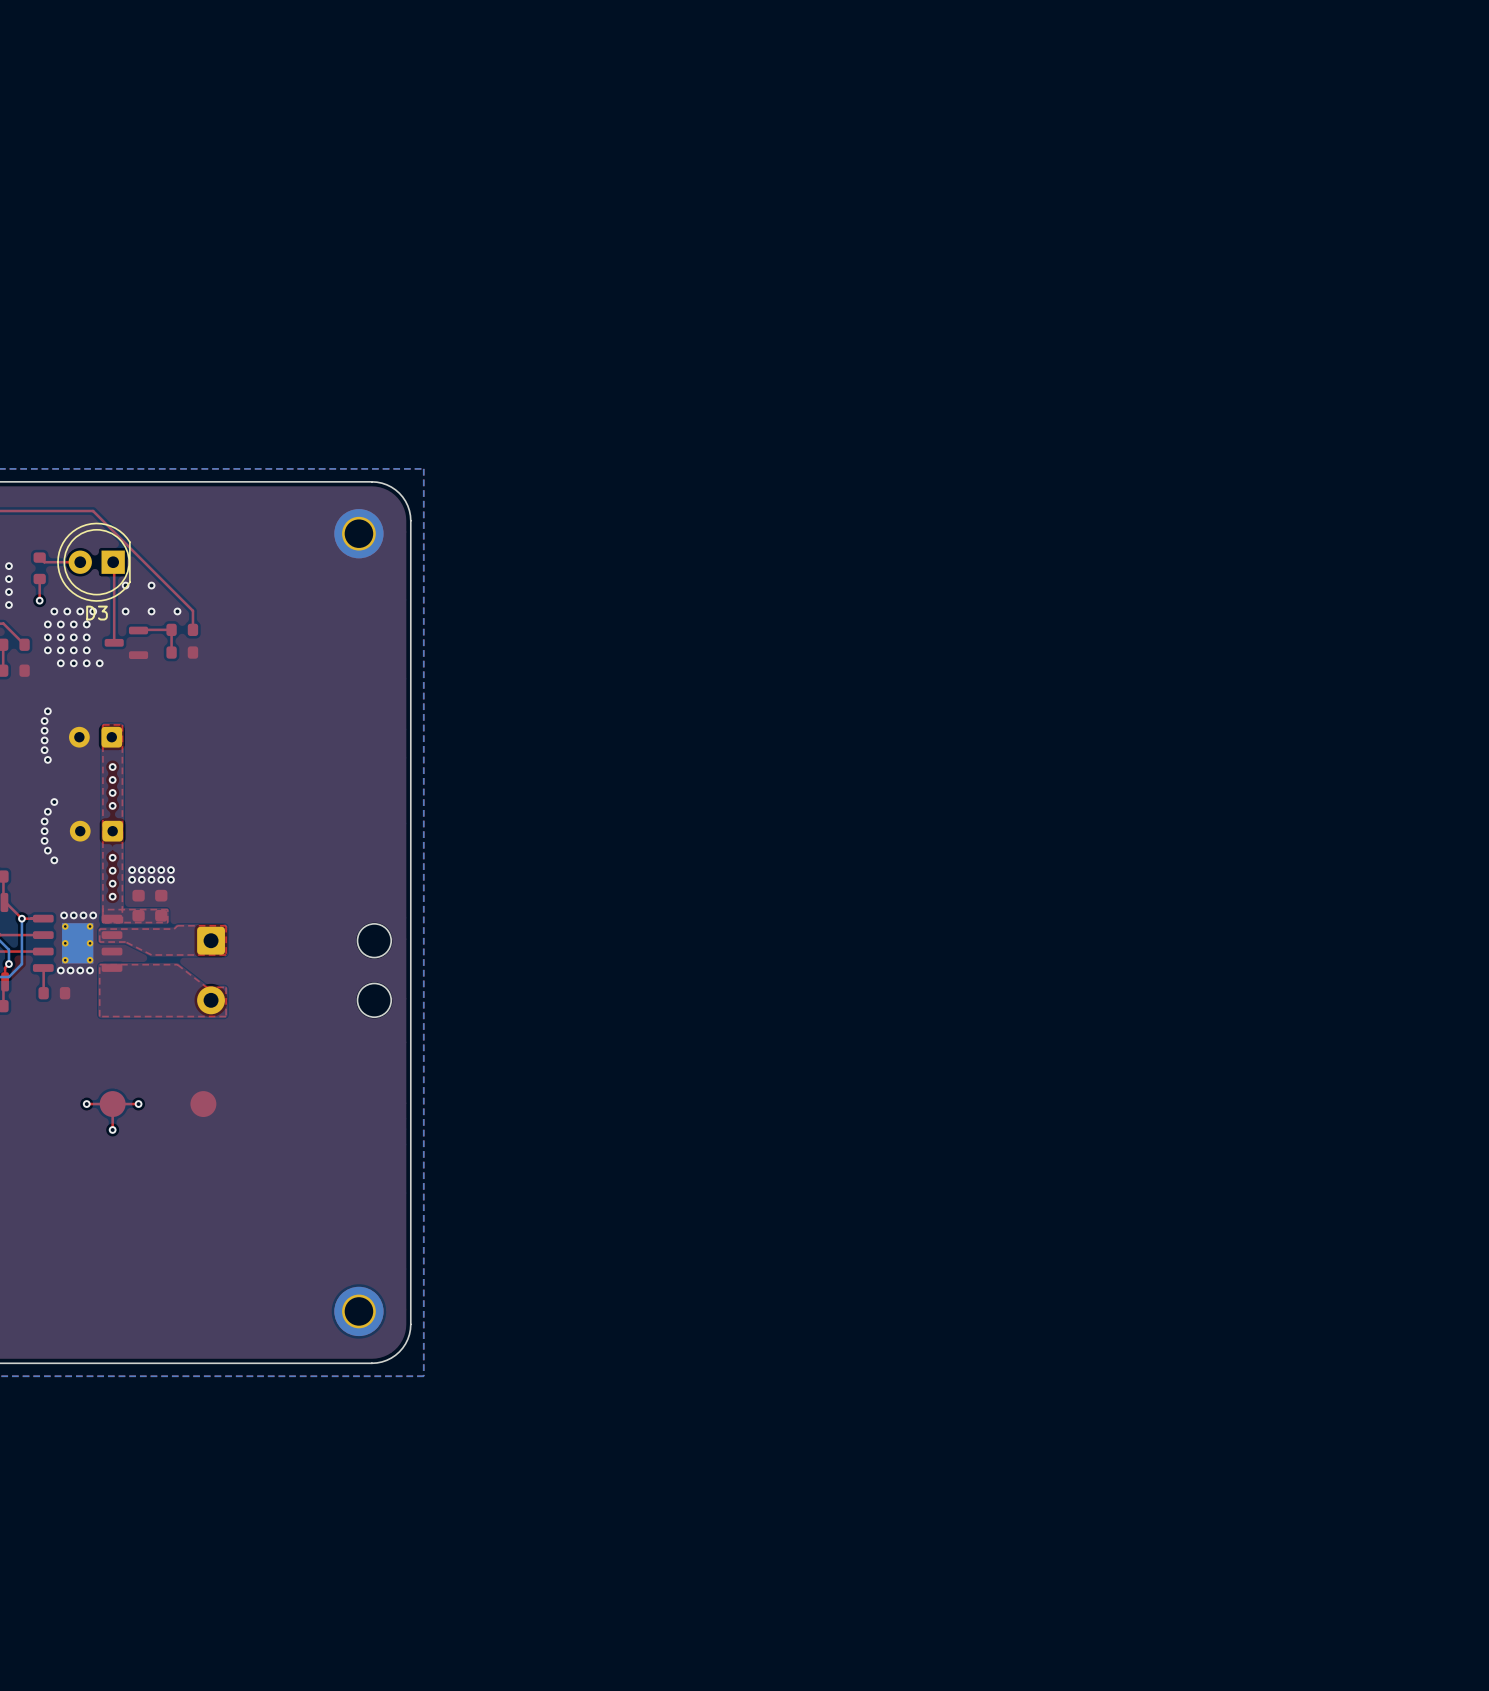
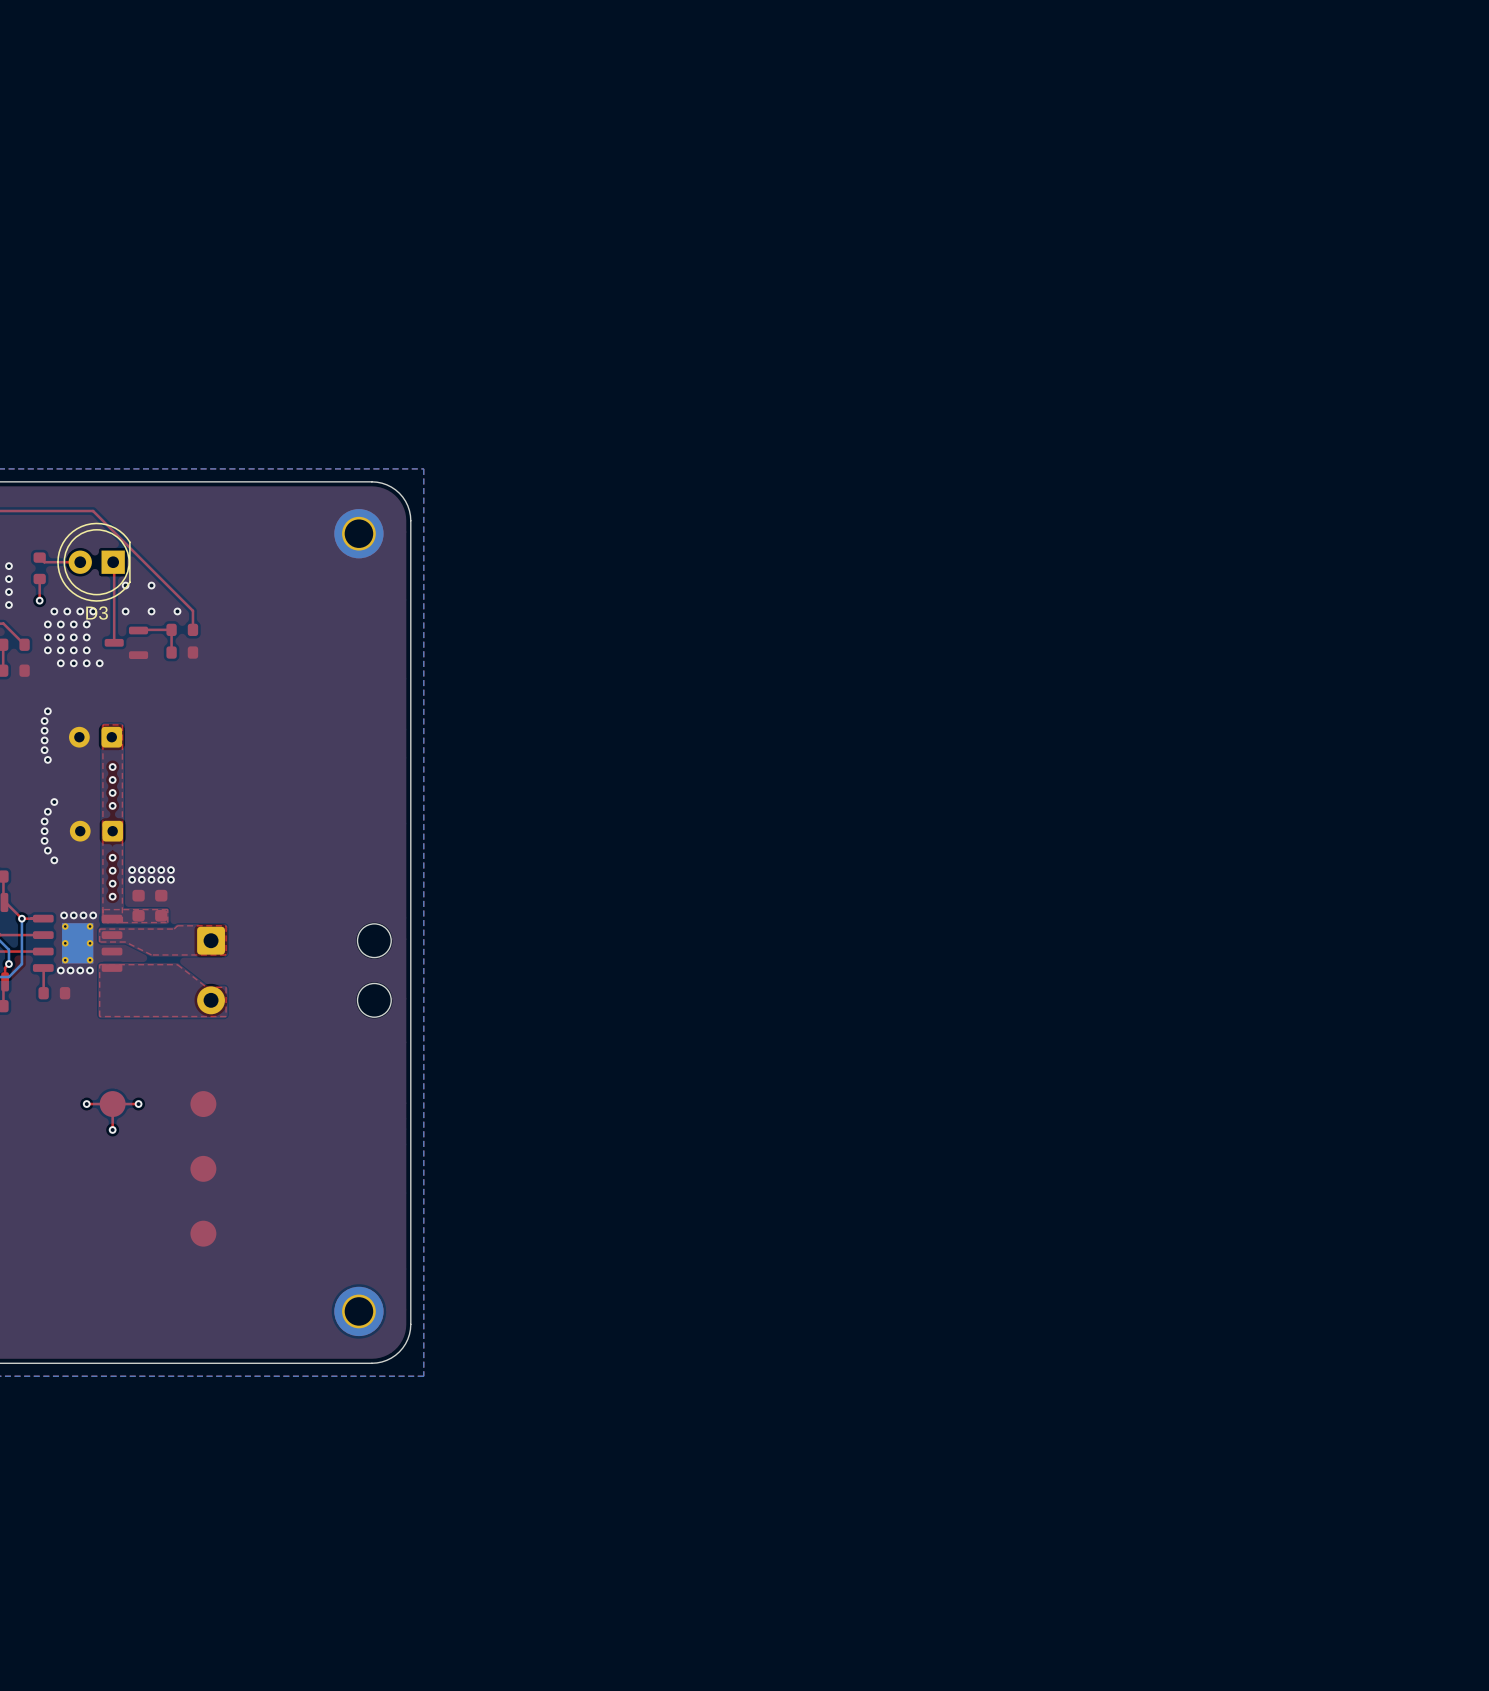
part: none -> (203, 1168)
part: none -> (203, 1233)

